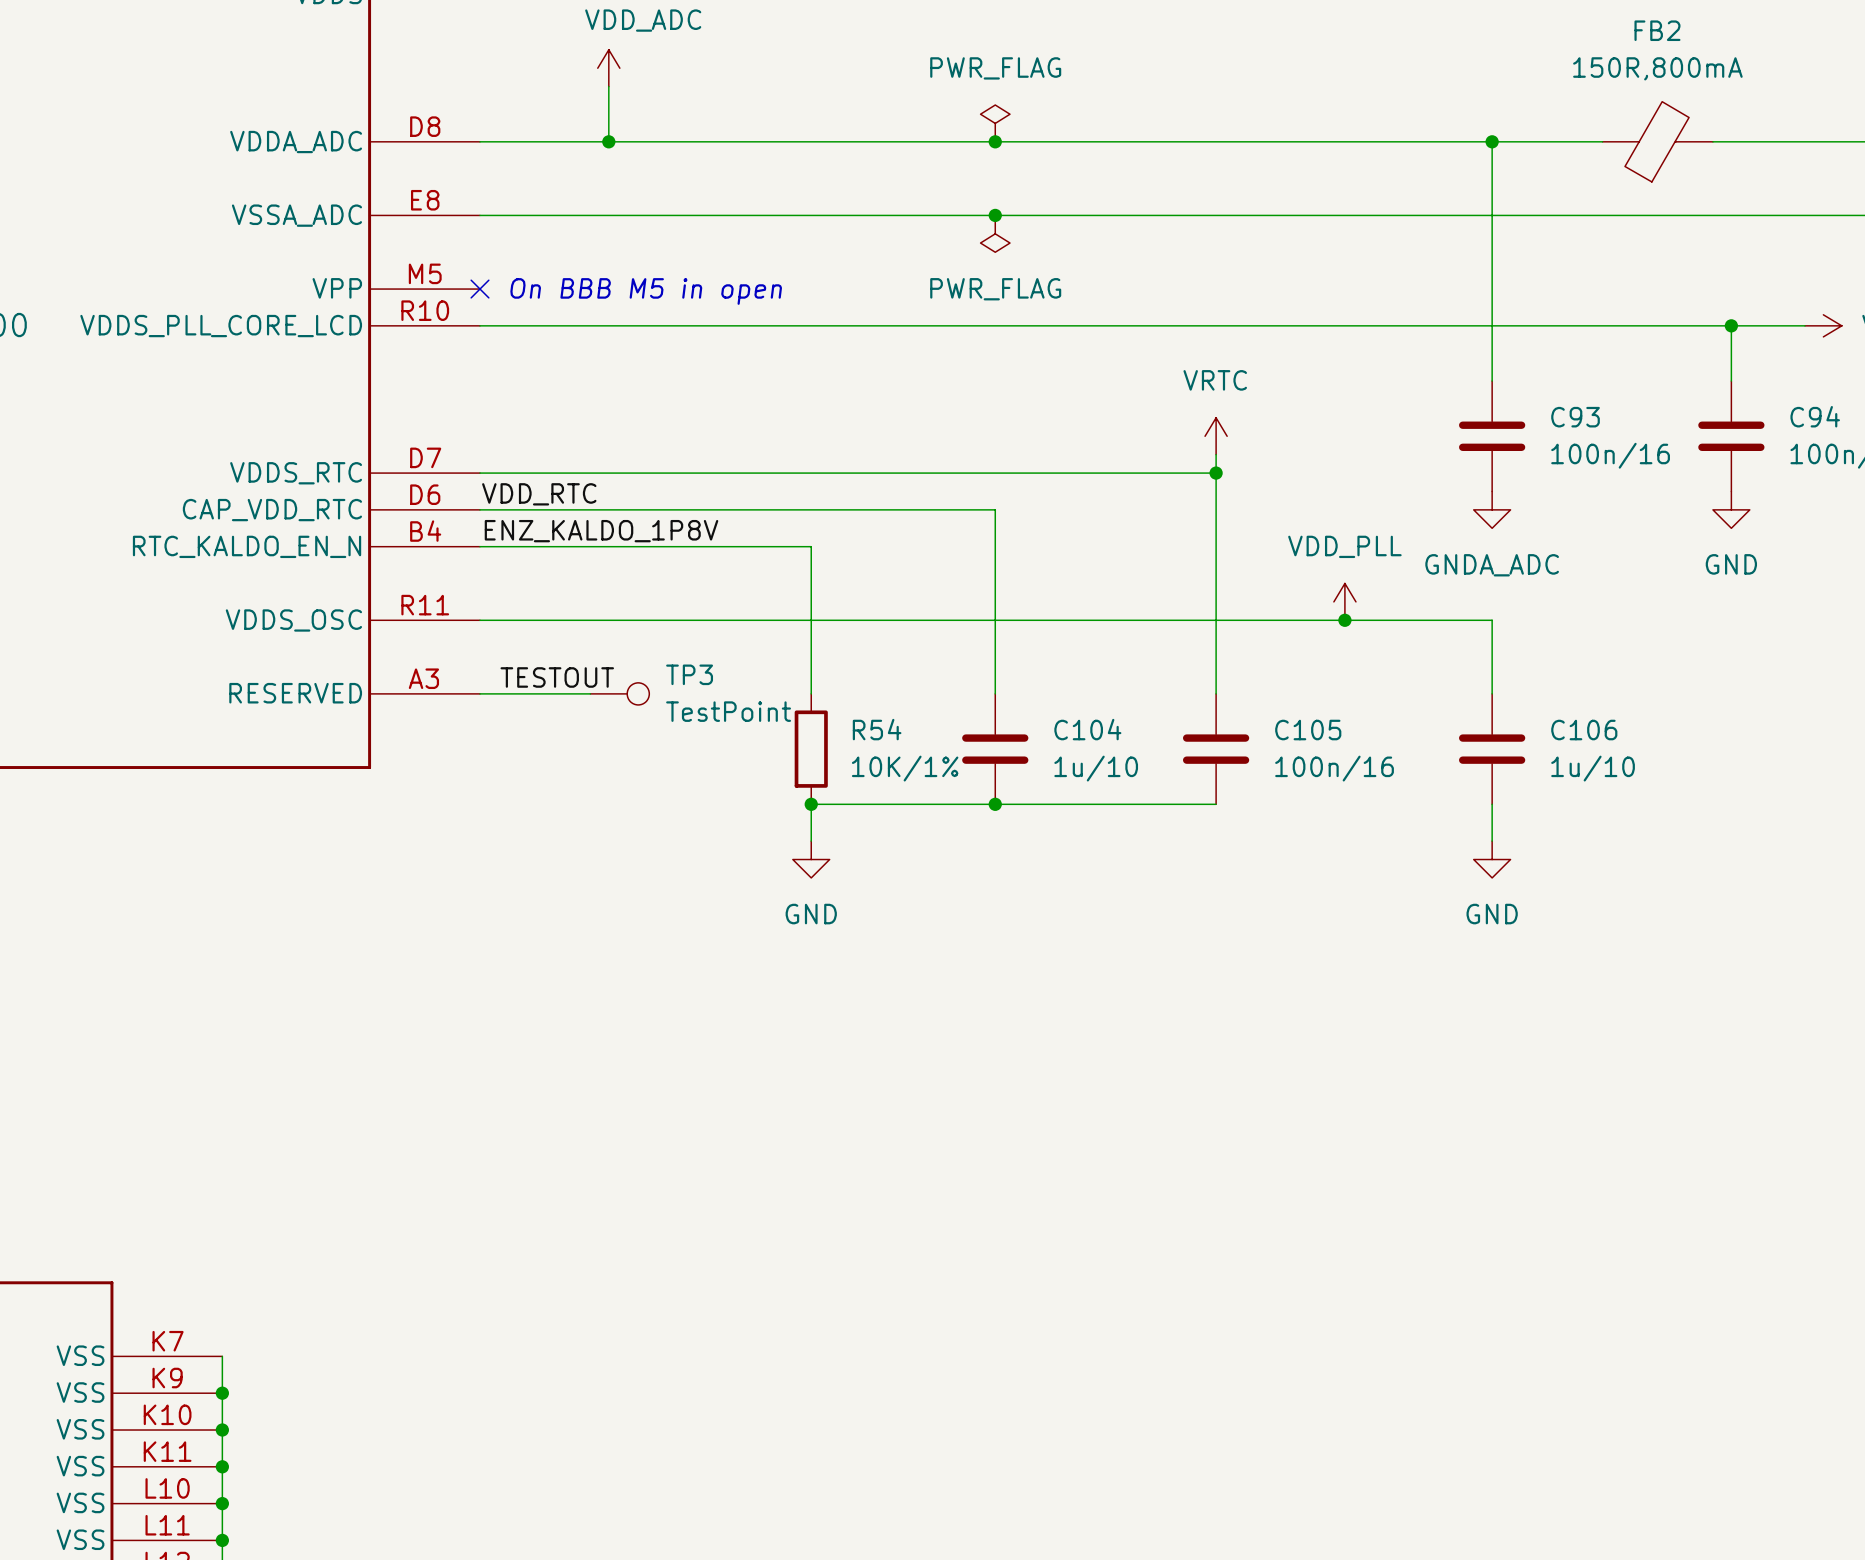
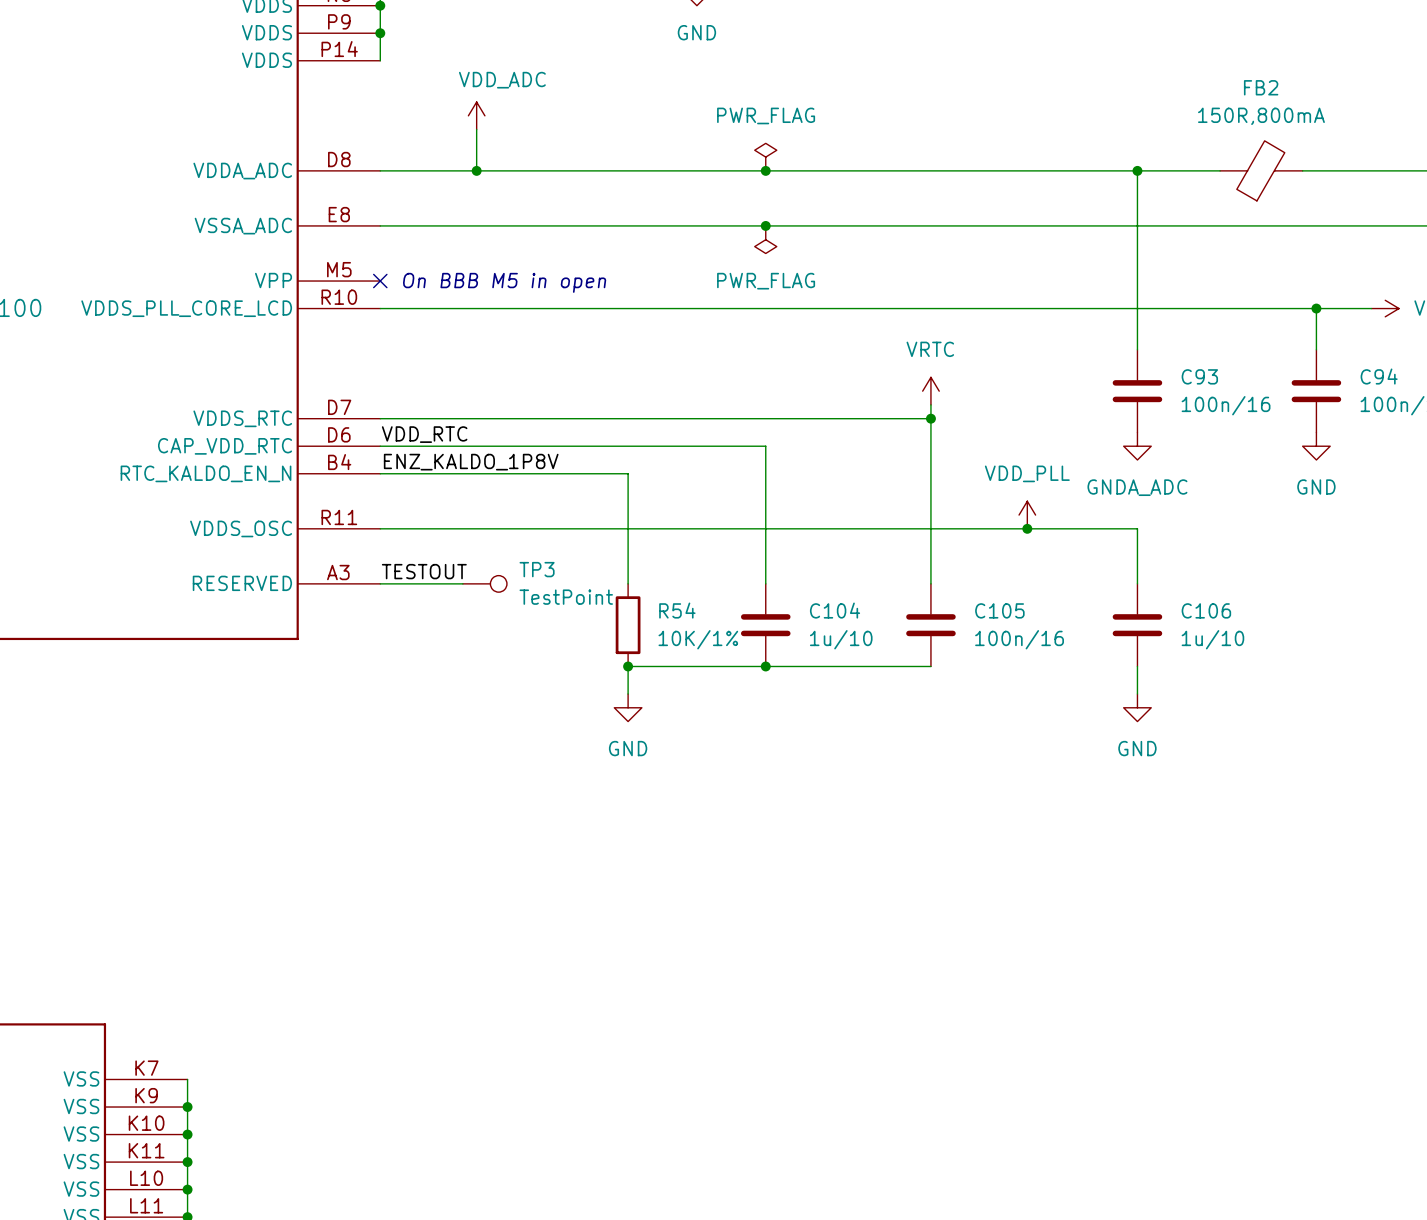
label position: TESTOUT (557, 677) -> TESTOUT (424, 571)

